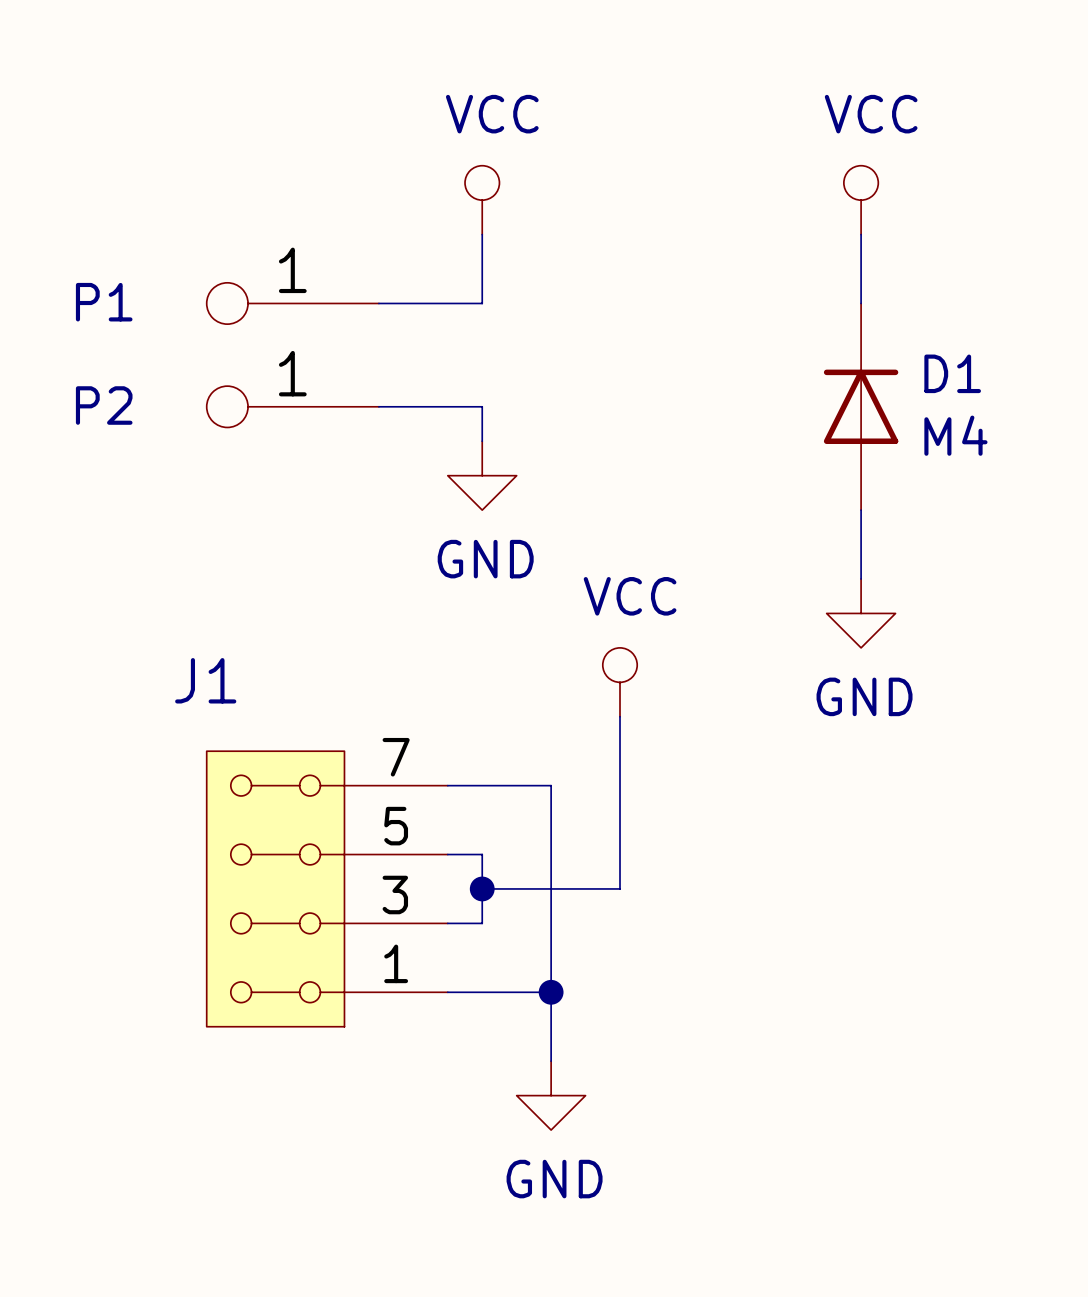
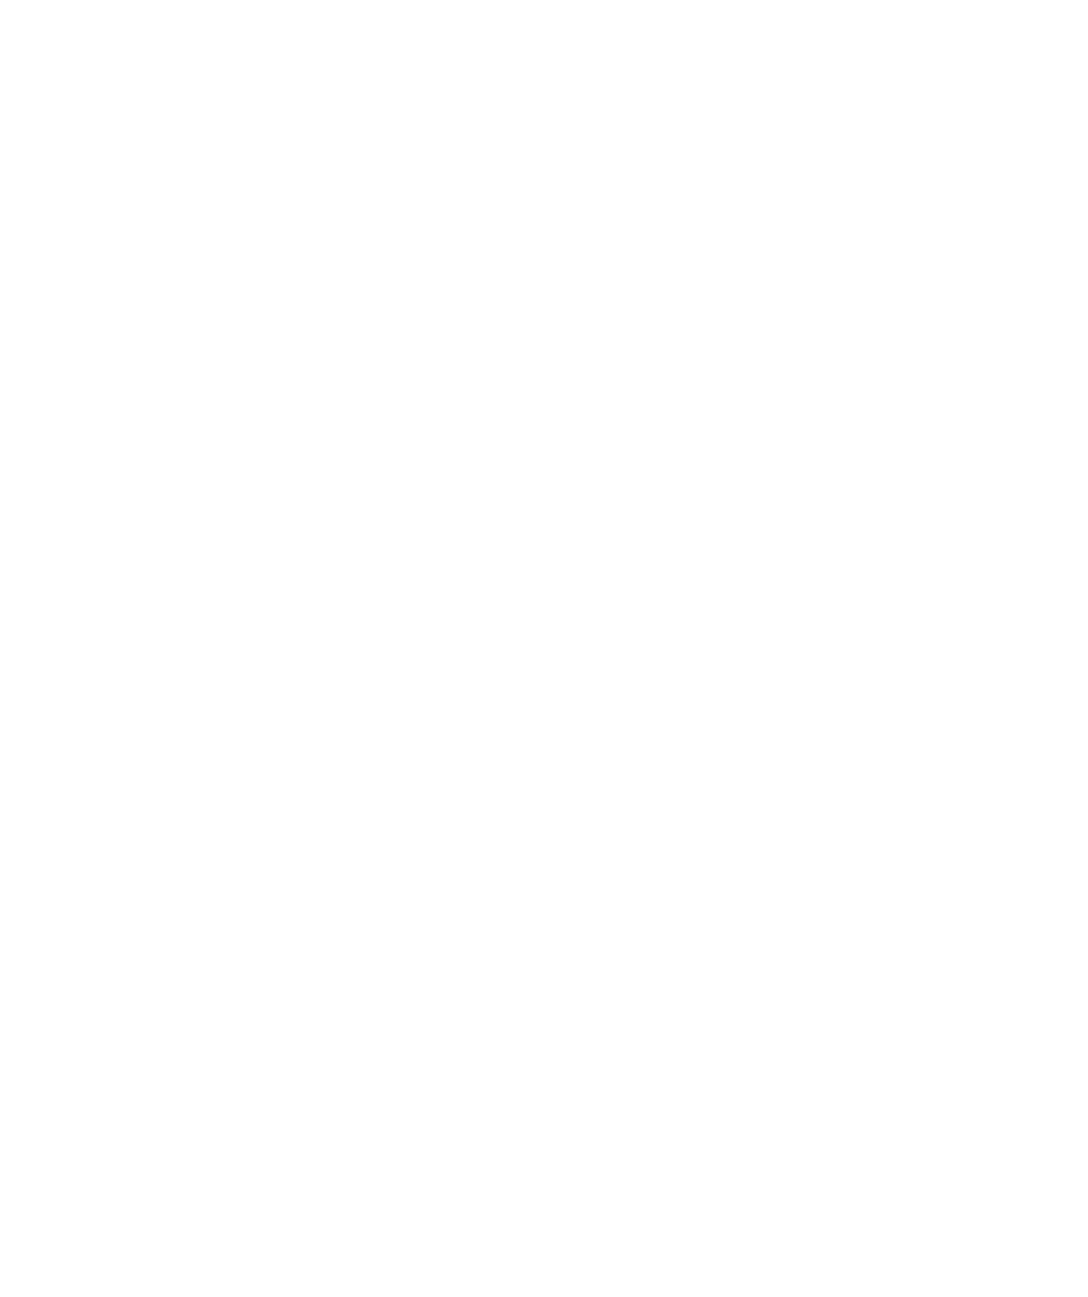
power symbol: VCC (482, 200) -> none
power symbol: VCC (861, 200) -> none
wire: (482, 234) (482, 303) (378, 303) -> none
wire: (861, 234) (861, 303) -> none
P1: (292, 303) -> none
P2: (292, 406) -> none
wire: (378, 406) (482, 406) (482, 441) -> none
D1: M4 (861, 406) -> none
power symbol: GND (482, 475) -> none
wire: (861, 510) (861, 579) -> none
power symbol: GND (861, 613) -> none
power symbol: VCC (620, 682) -> none
wire: (620, 716) (620, 888) (482, 888) -> none
wire: (447, 785) (551, 785) (551, 1061) -> none
wire: (447, 854) (482, 854) (482, 923) (447, 923) -> none
J1: (327, 888) -> none
junction: (482, 888) -> none
wire: (447, 992) (551, 992) -> none
junction: (551, 992) -> none
power symbol: GND (551, 1095) -> none

